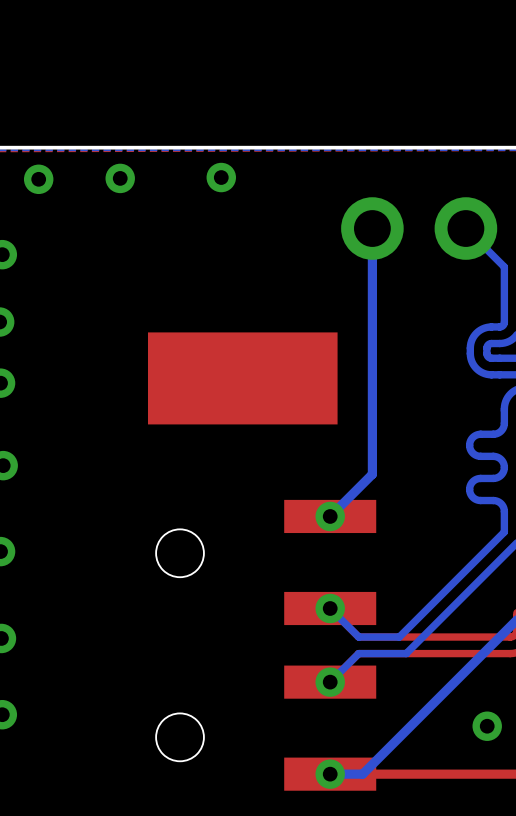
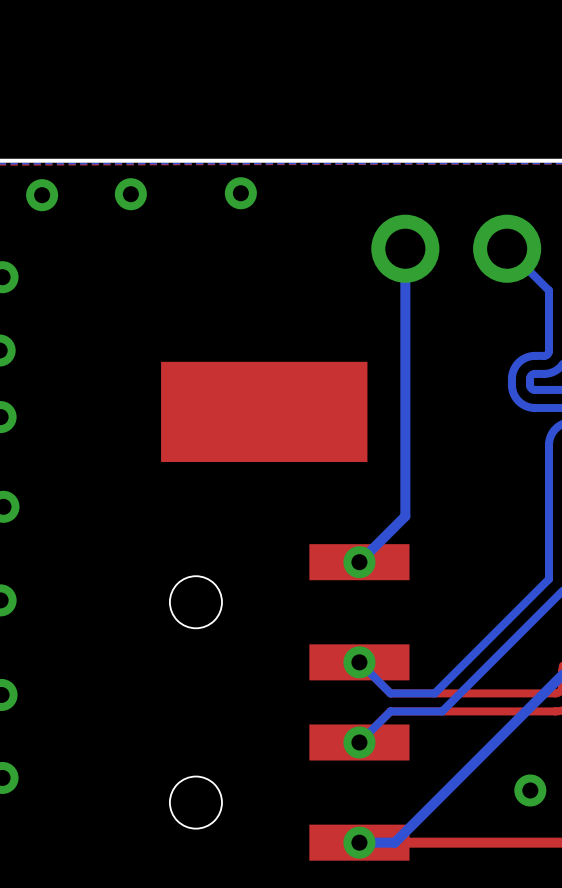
bottom track: (504, 423) (502, 428) (497, 433) (475, 435) (469, 445) (471, 450) (476, 455) (500, 458) (504, 465) (502, 472) (496, 478) (475, 479) (469, 489) (475, 499) (497, 501) (502, 504) (504, 511) -> (549, 460) (549, 556)

